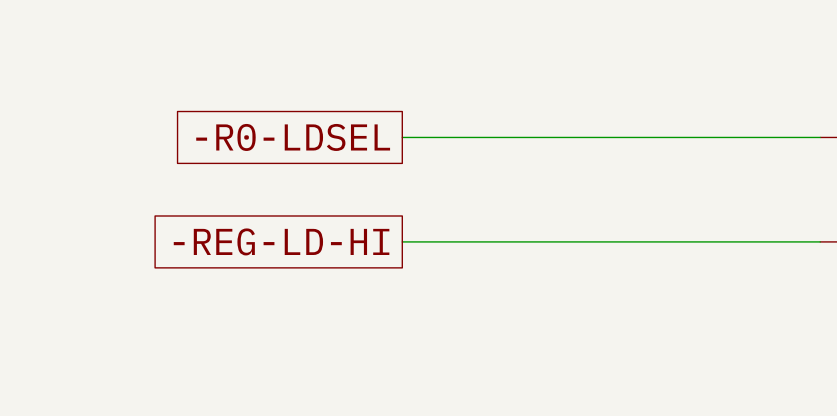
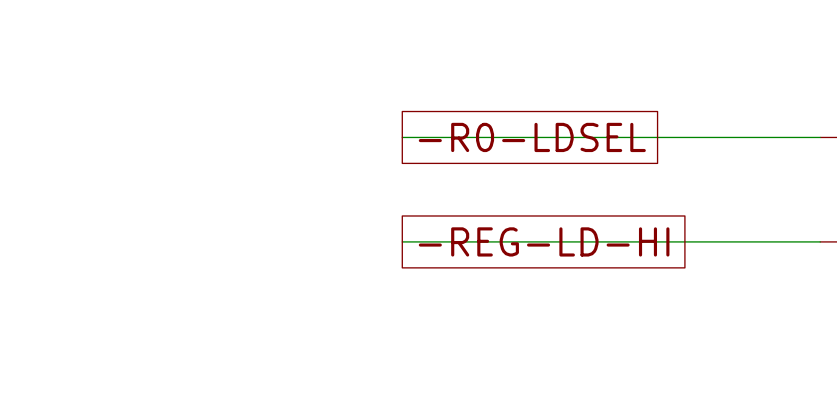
global label rotation: 0° (293, 137) -> 180° (532, 137)
global label rotation: 0° (281, 241) -> 180° (544, 241)

